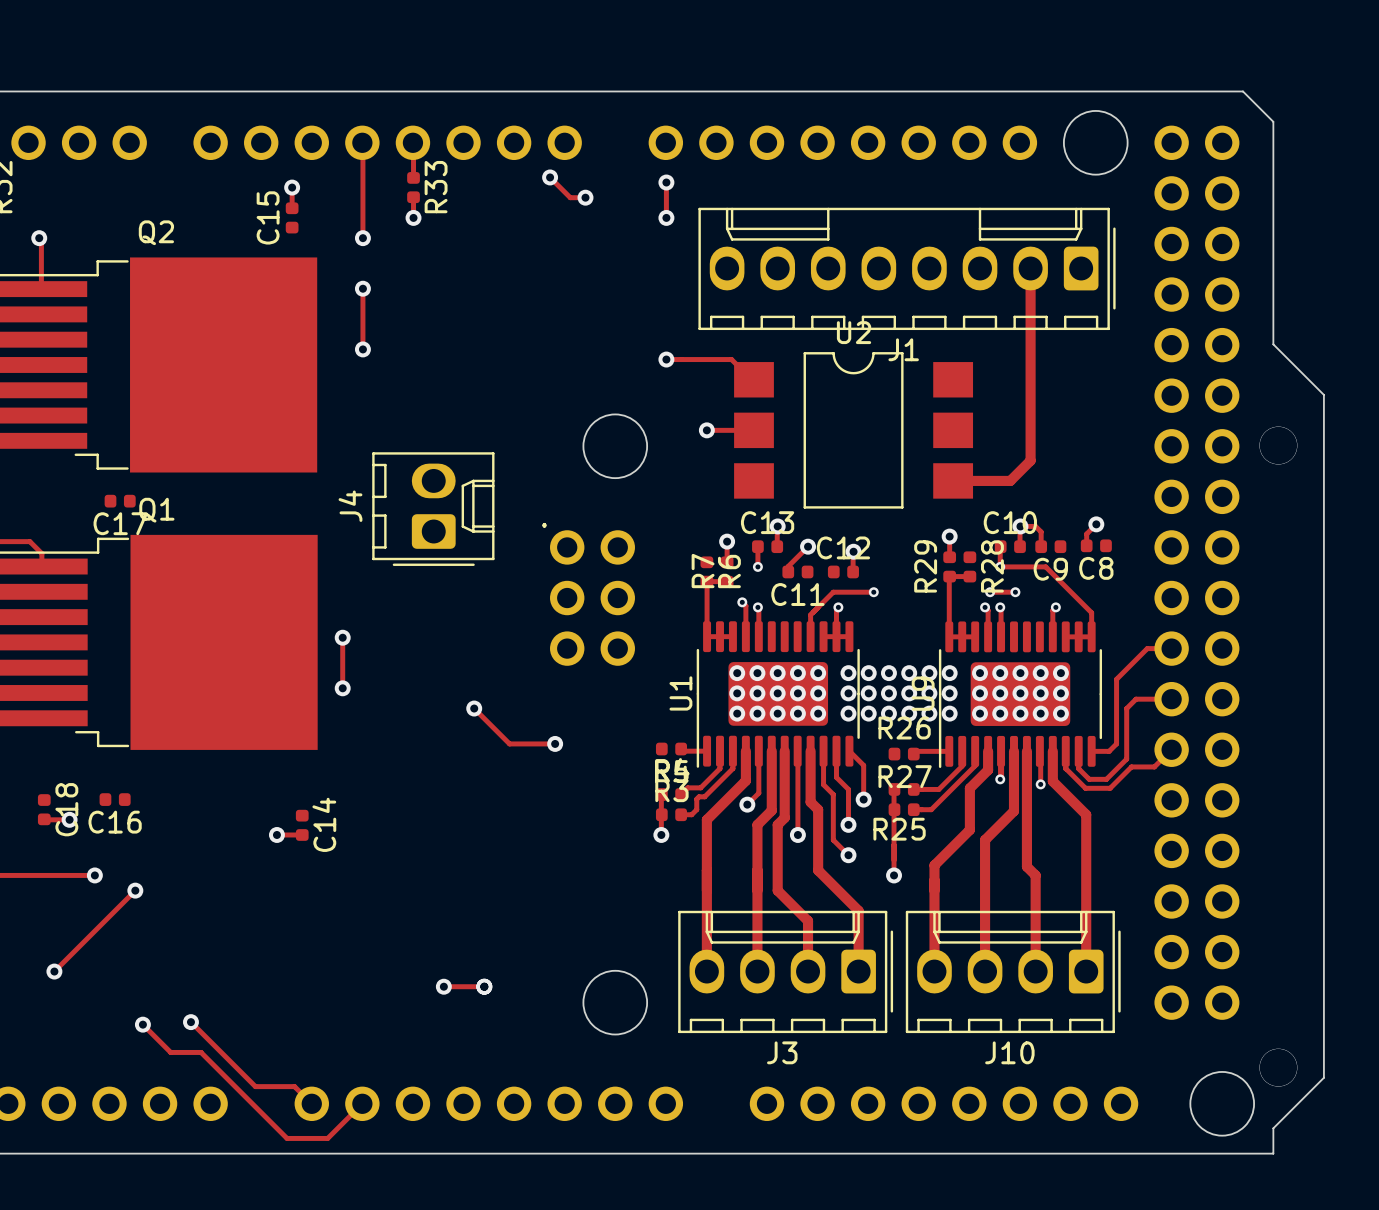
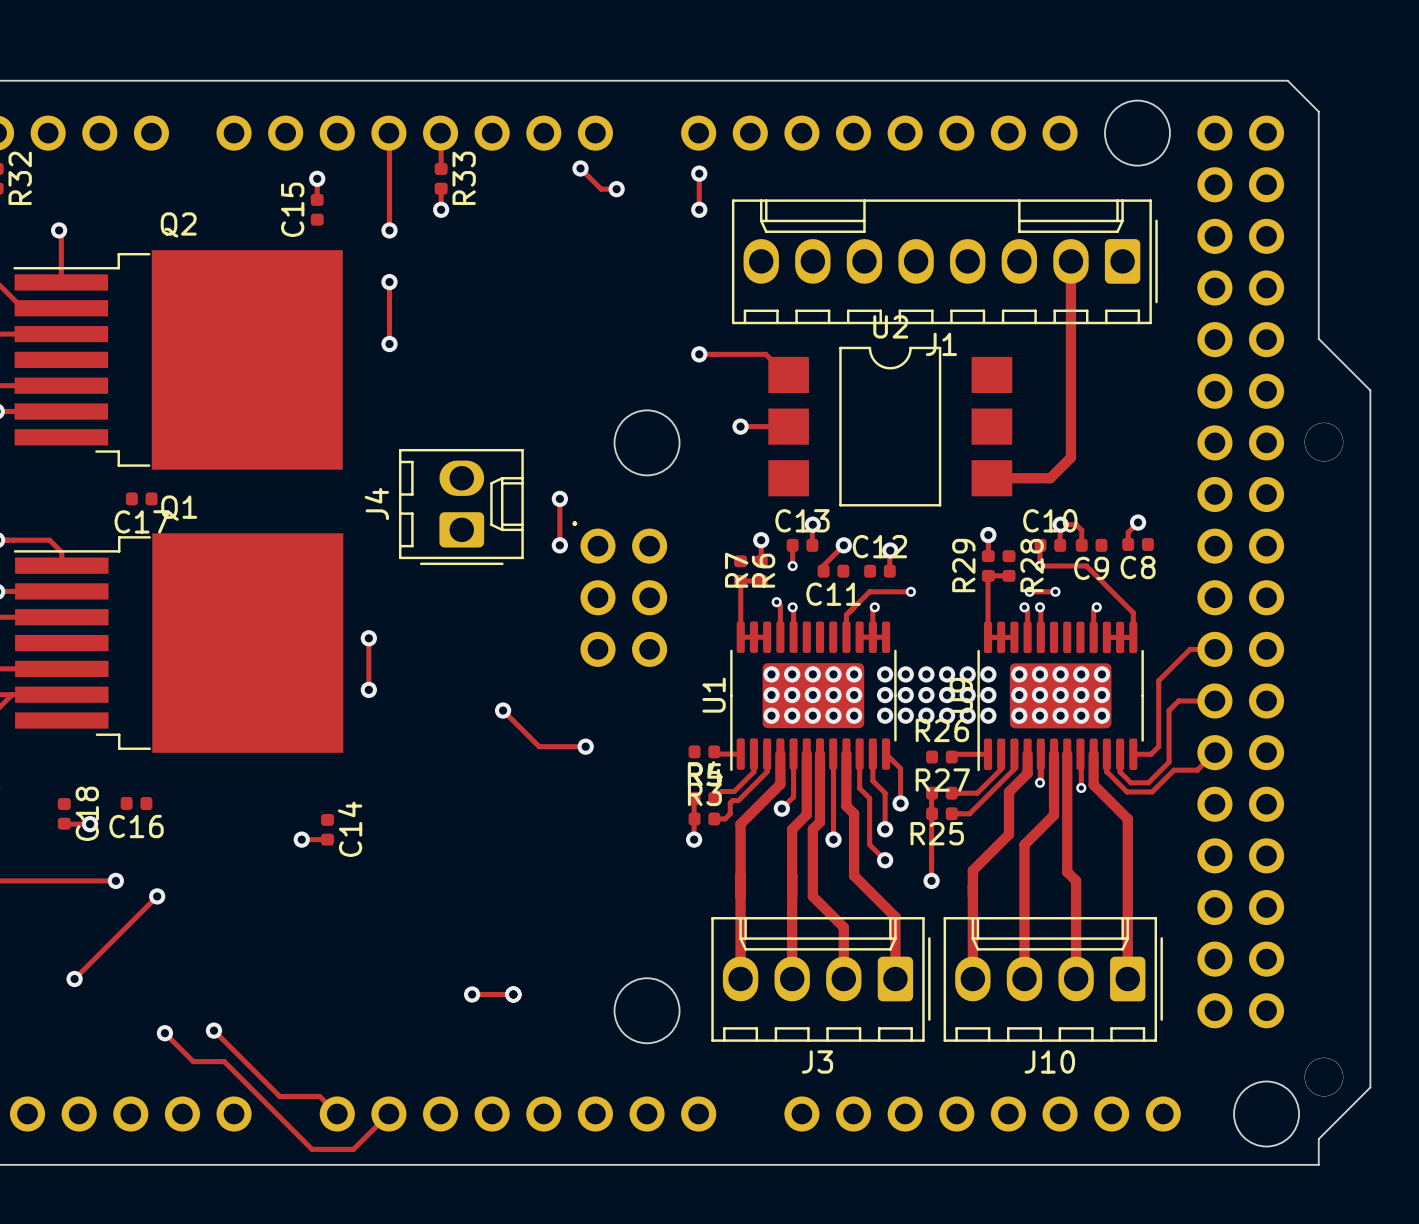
track: none -> (559, 498) (559, 545)
via: none -> (559, 498)
via: none -> (559, 545)

